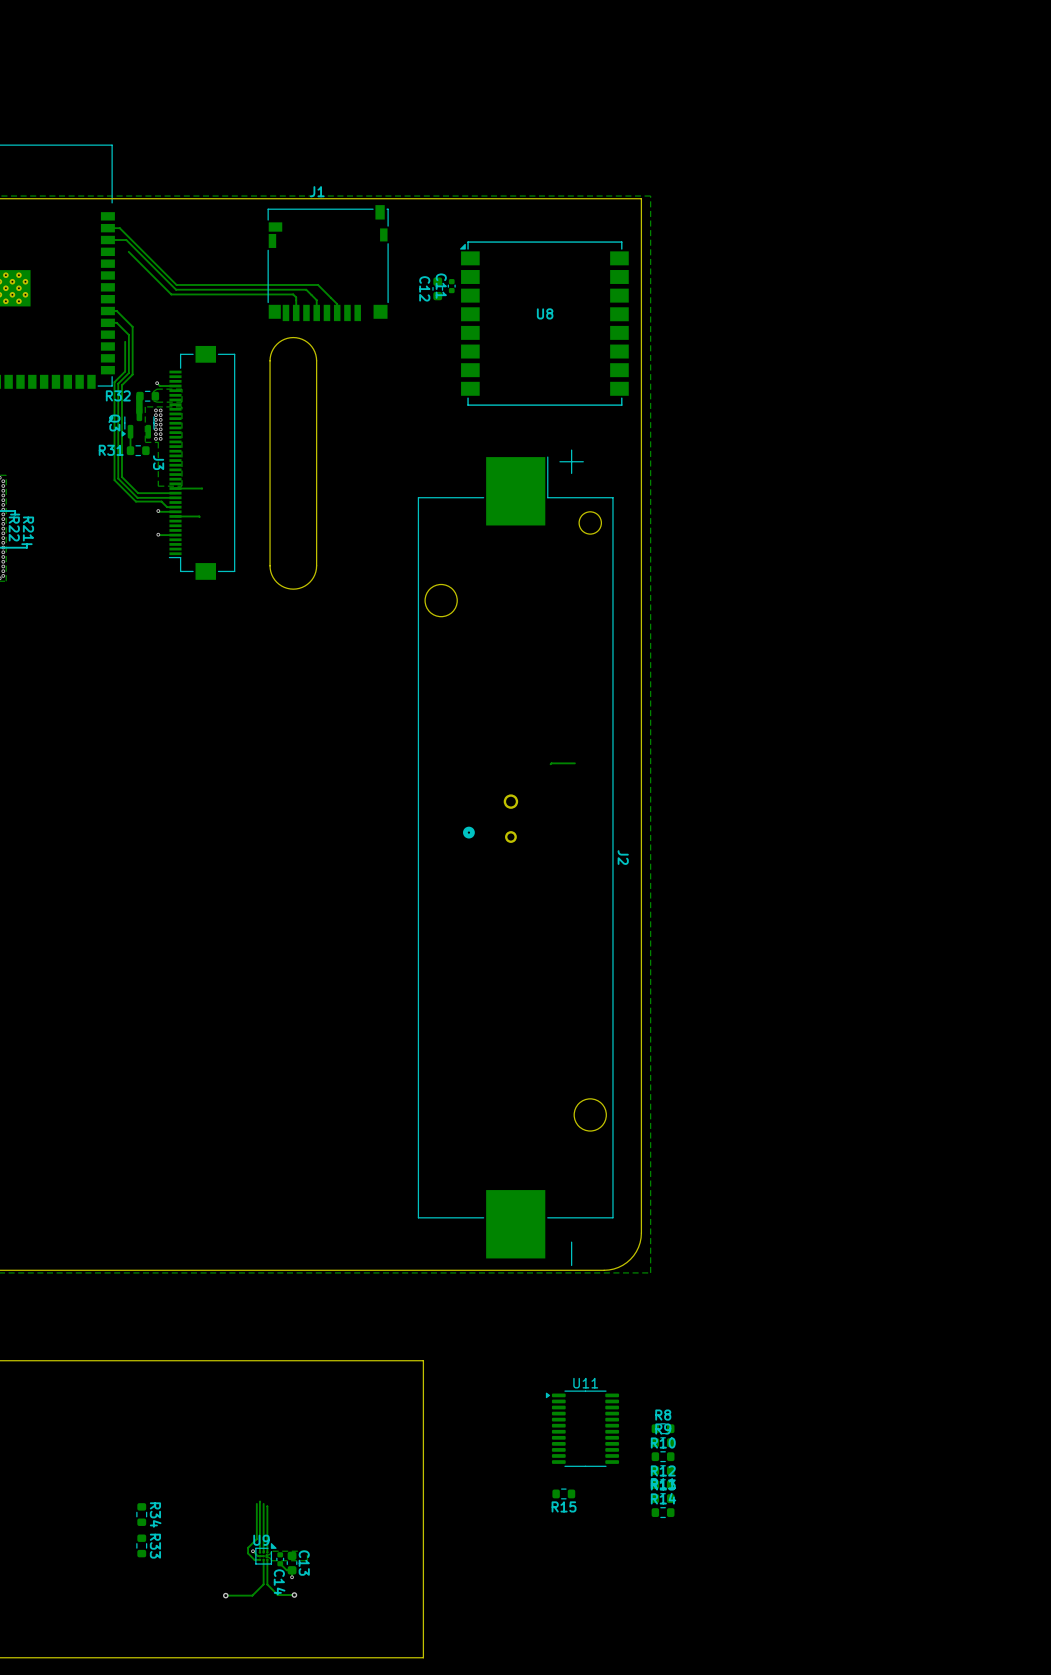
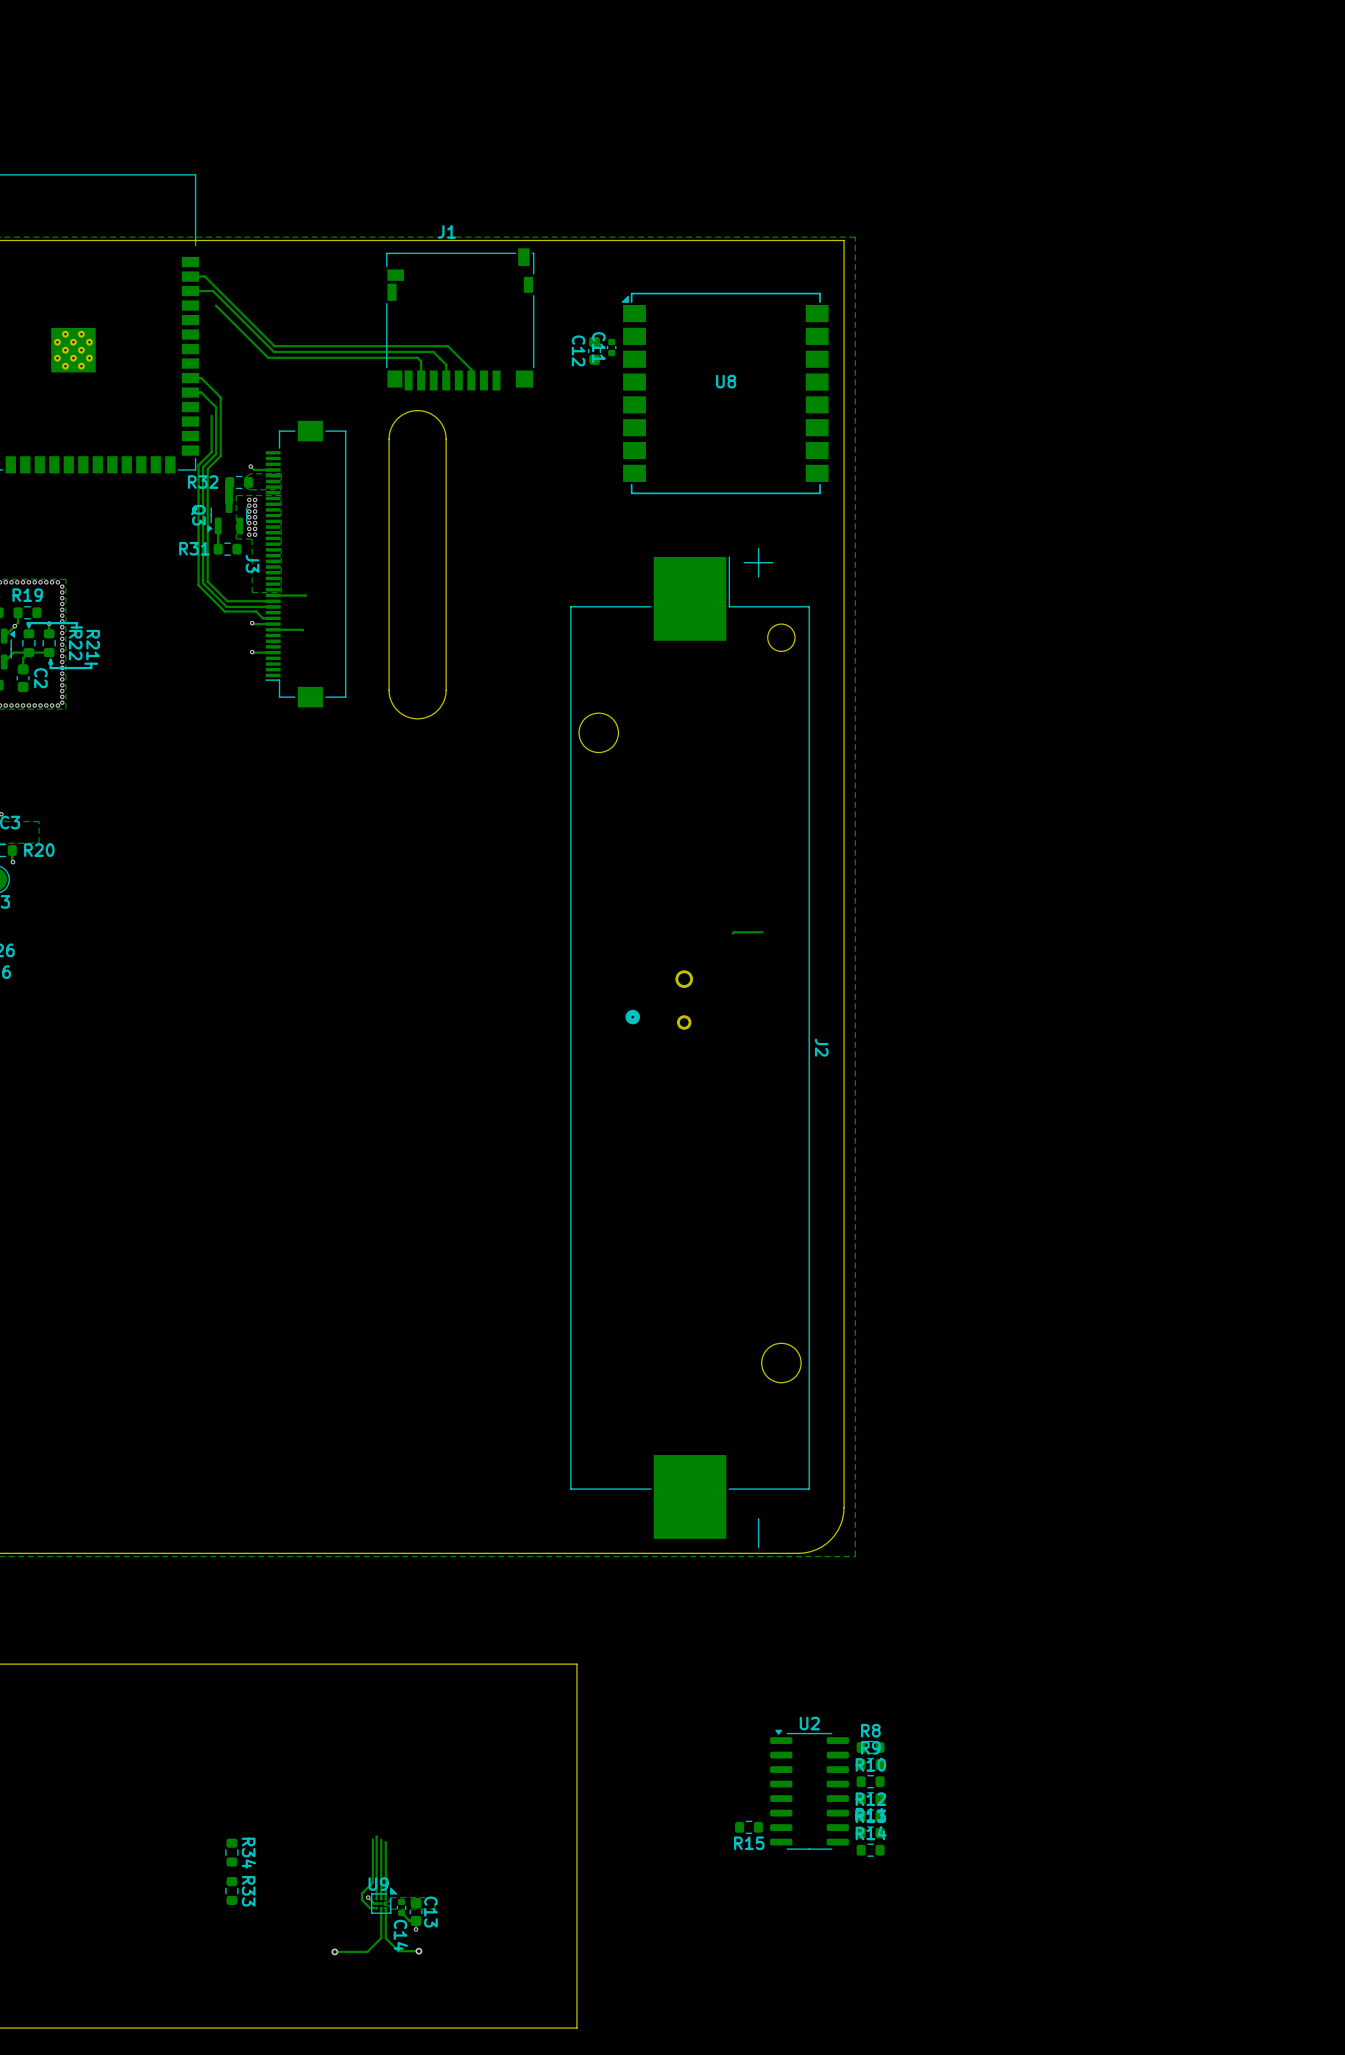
U11: (582, 1428) -> none
U2: none -> (809, 1789)

